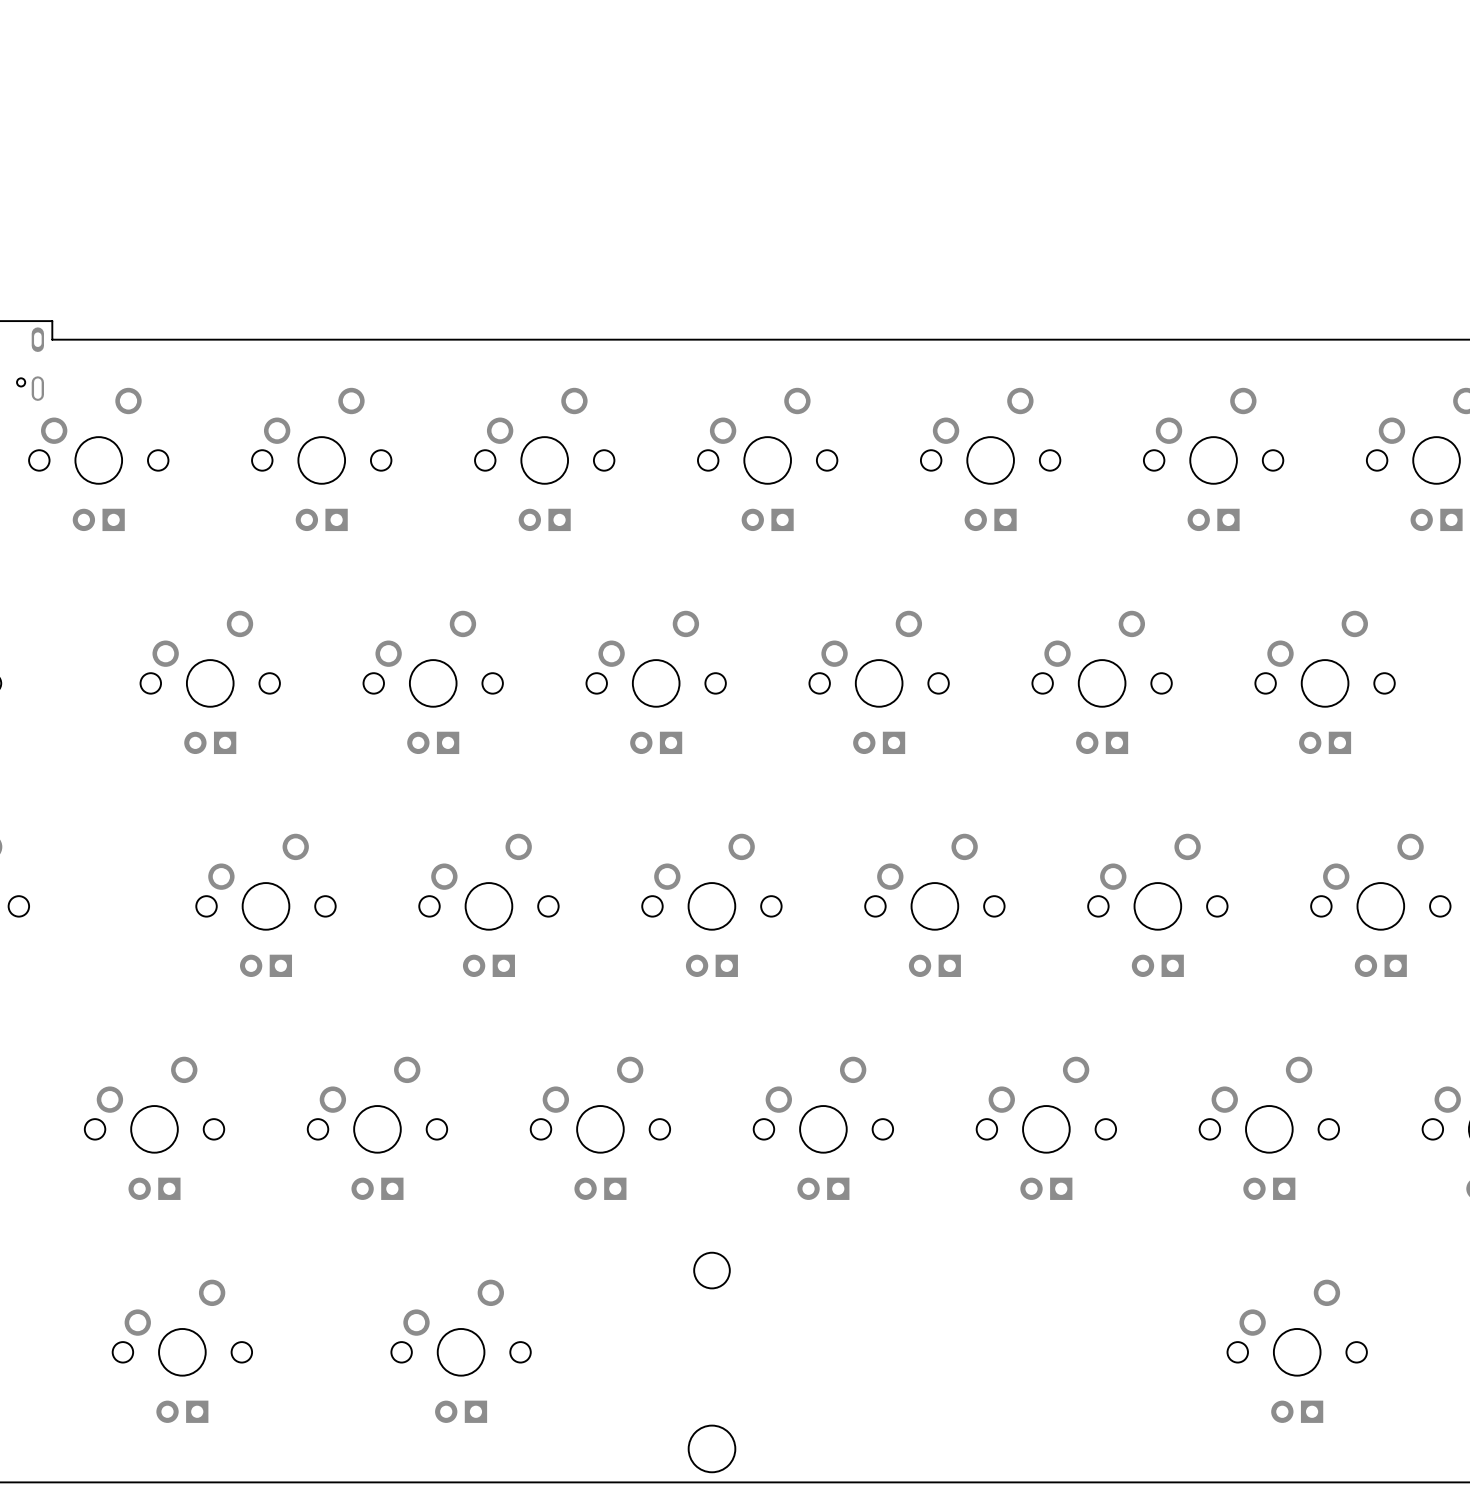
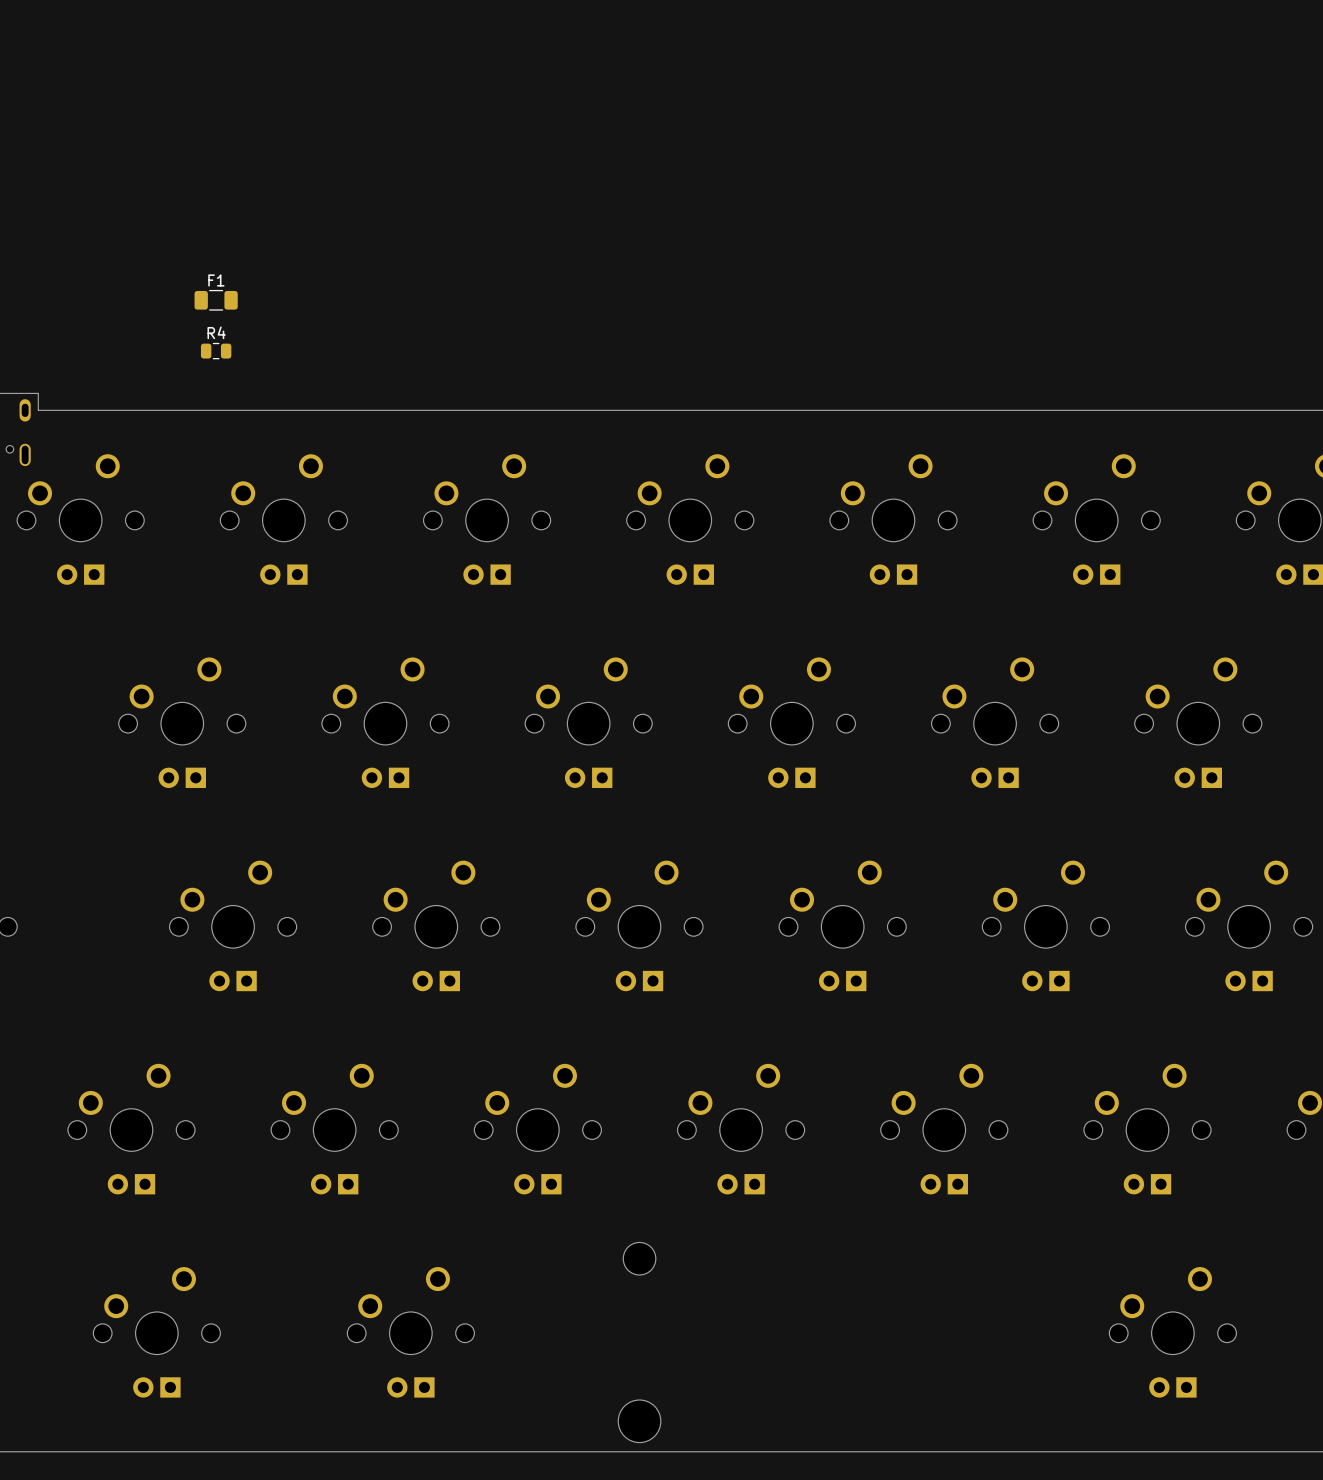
F1: none -> (216, 300)
R4: none -> (216, 351)

